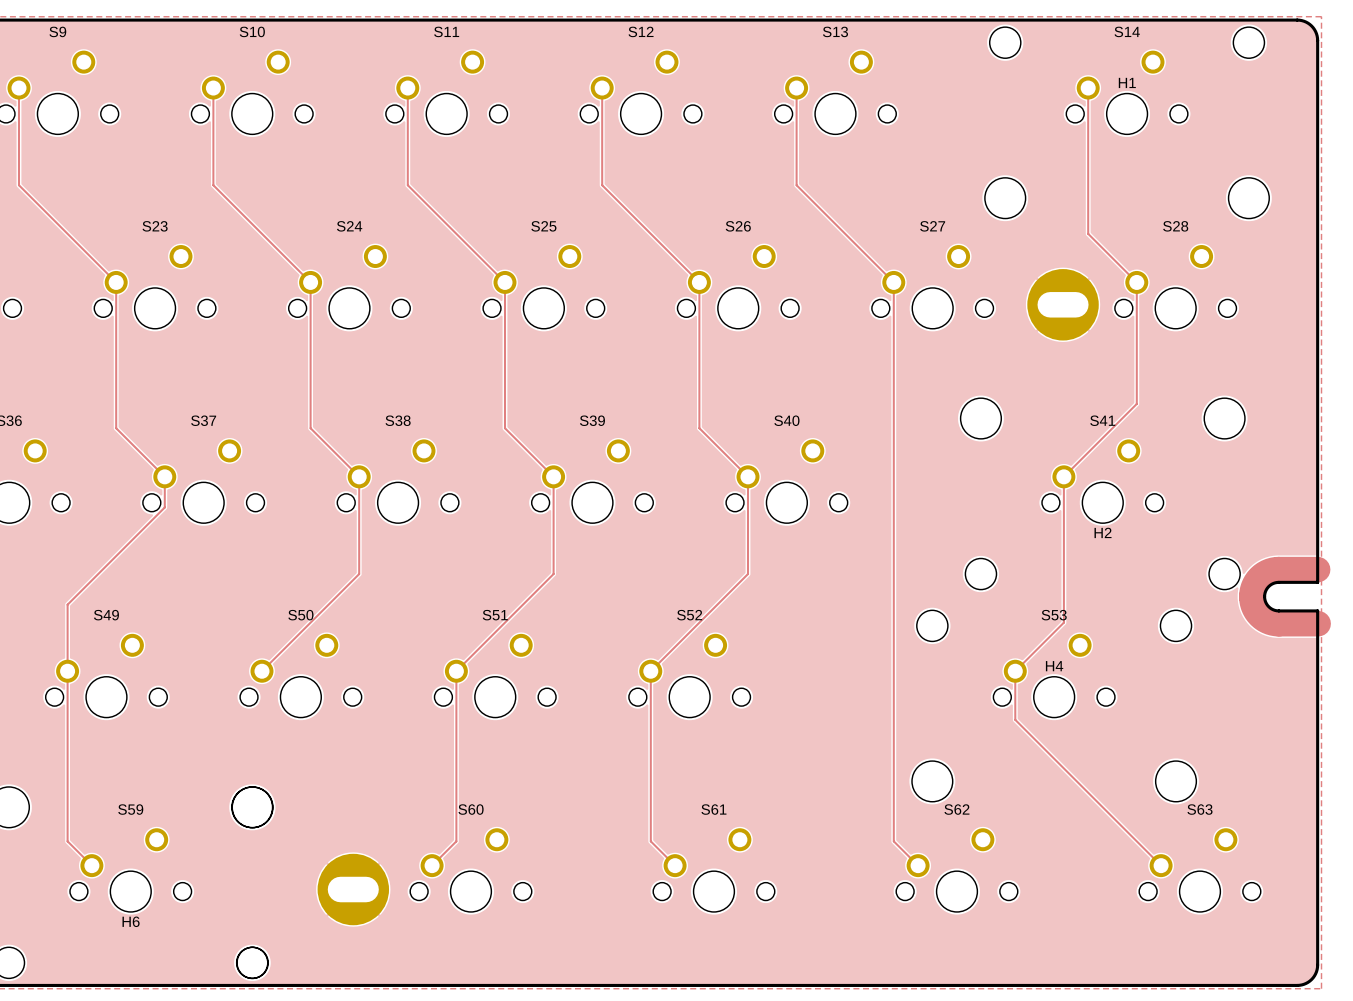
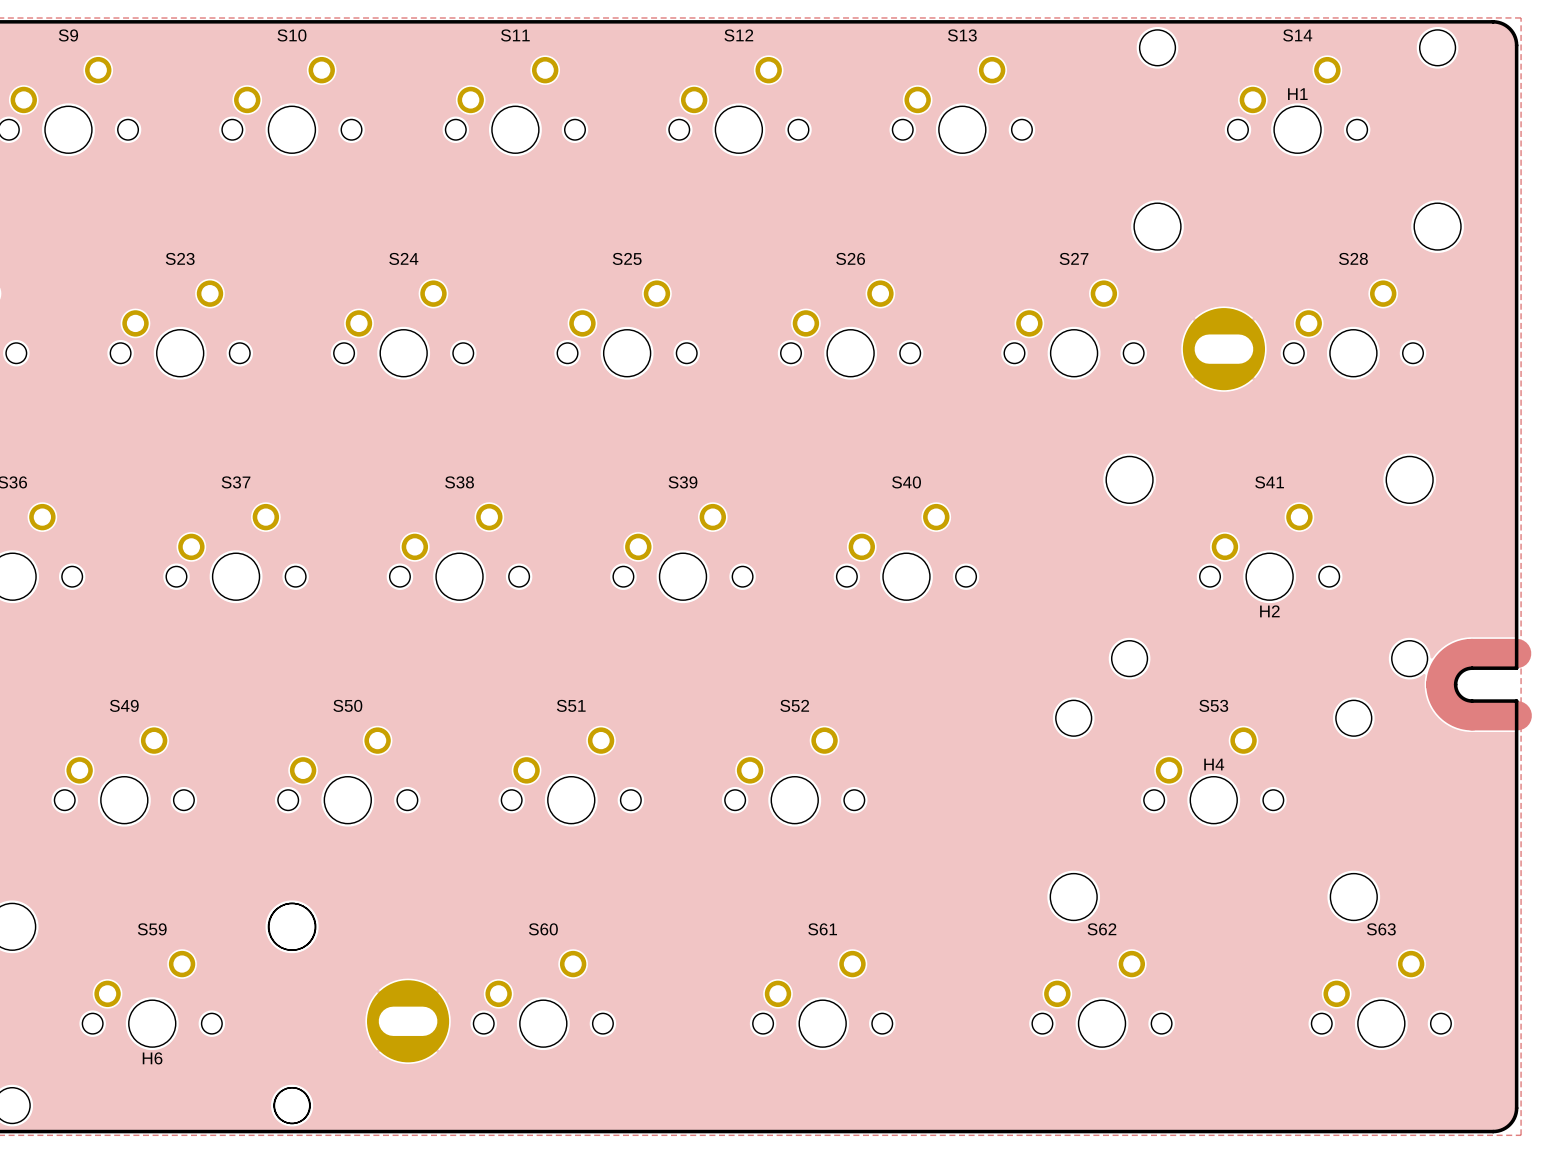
track: (18, 88) (18, 185) (116, 282) (116, 428) (164, 476) (164, 507) (67, 604) (67, 841) (91, 865) -> none
track: (213, 88) (213, 185) (310, 282) (310, 428) (359, 476) (359, 574) (261, 671) -> none
track: (407, 88) (407, 185) (504, 282) (504, 428) (553, 476) (553, 574) (456, 671) (456, 841) (432, 865) -> none
track: (602, 88) (602, 185) (699, 282) (699, 428) (747, 476) (747, 574) (650, 671) (650, 841) (675, 865) -> none
track: (796, 88) (796, 185) (893, 282) (893, 841) (918, 865) -> none
track: (1088, 88) (1088, 233) (1136, 282) (1136, 403) (1063, 476) (1063, 622) (1015, 671) (1015, 719) (1161, 865) -> none

